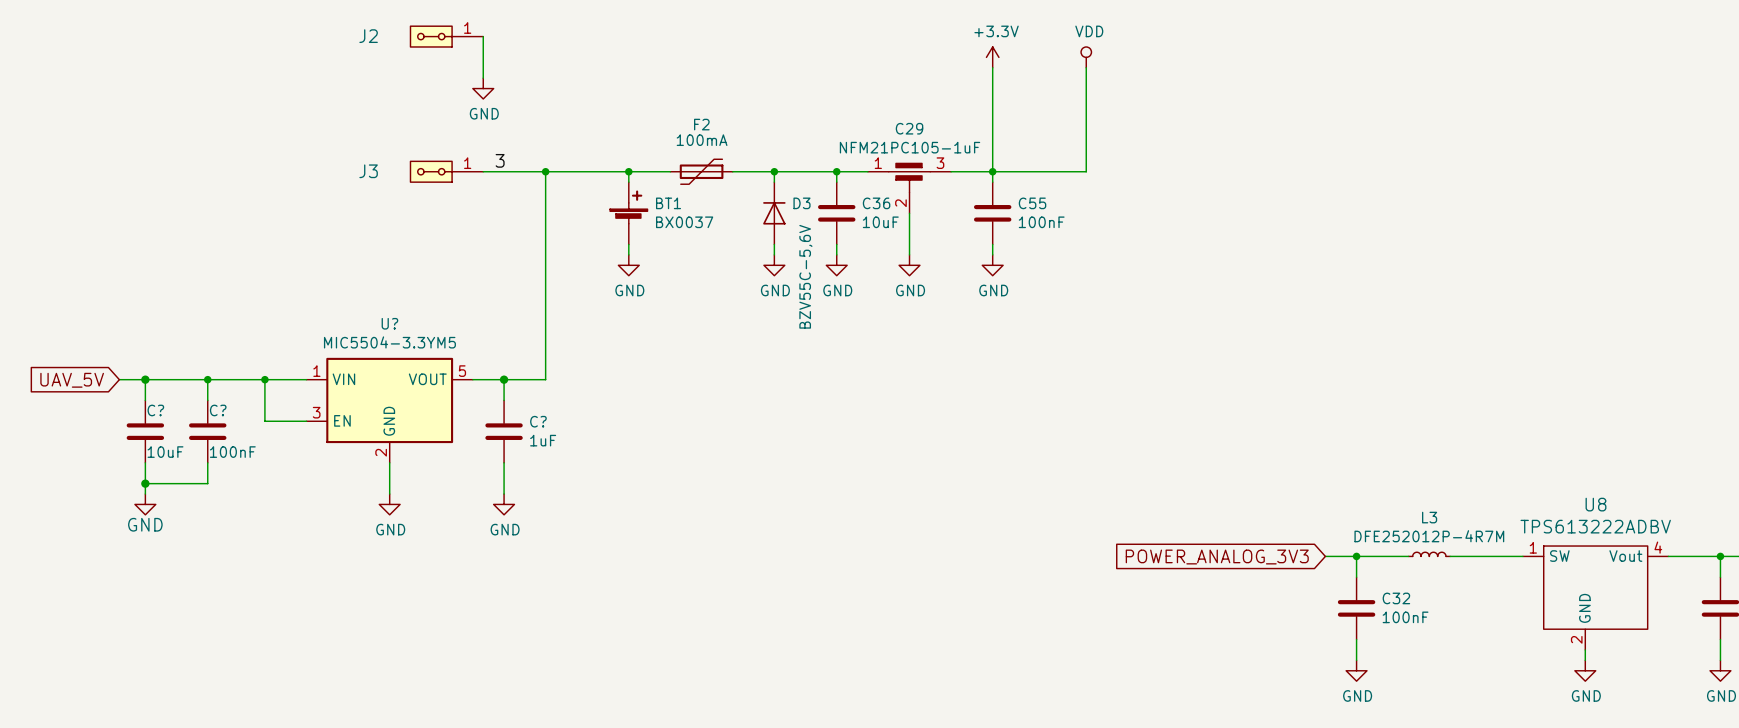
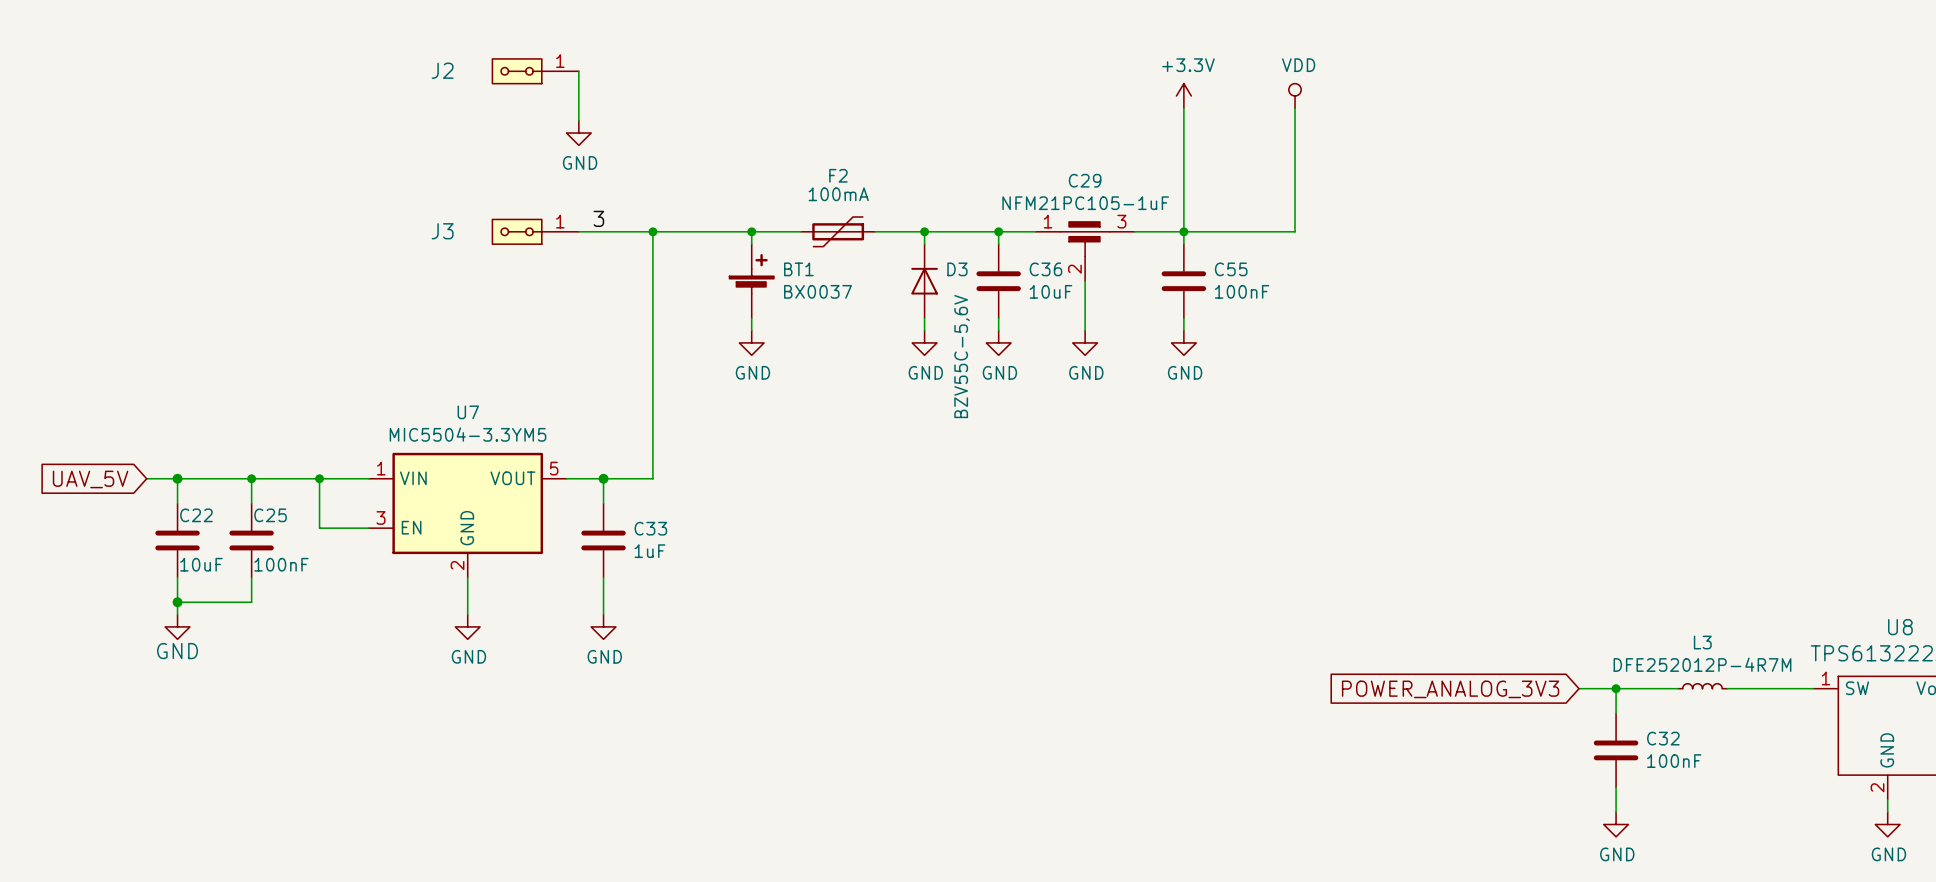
U? name: U? (389, 323) -> U7 (468, 412)
C? name: C? (155, 410) -> C22 (196, 515)
C? name: C? (218, 410) -> C25 (270, 515)
C? name: C? (538, 421) -> C33 (650, 528)

